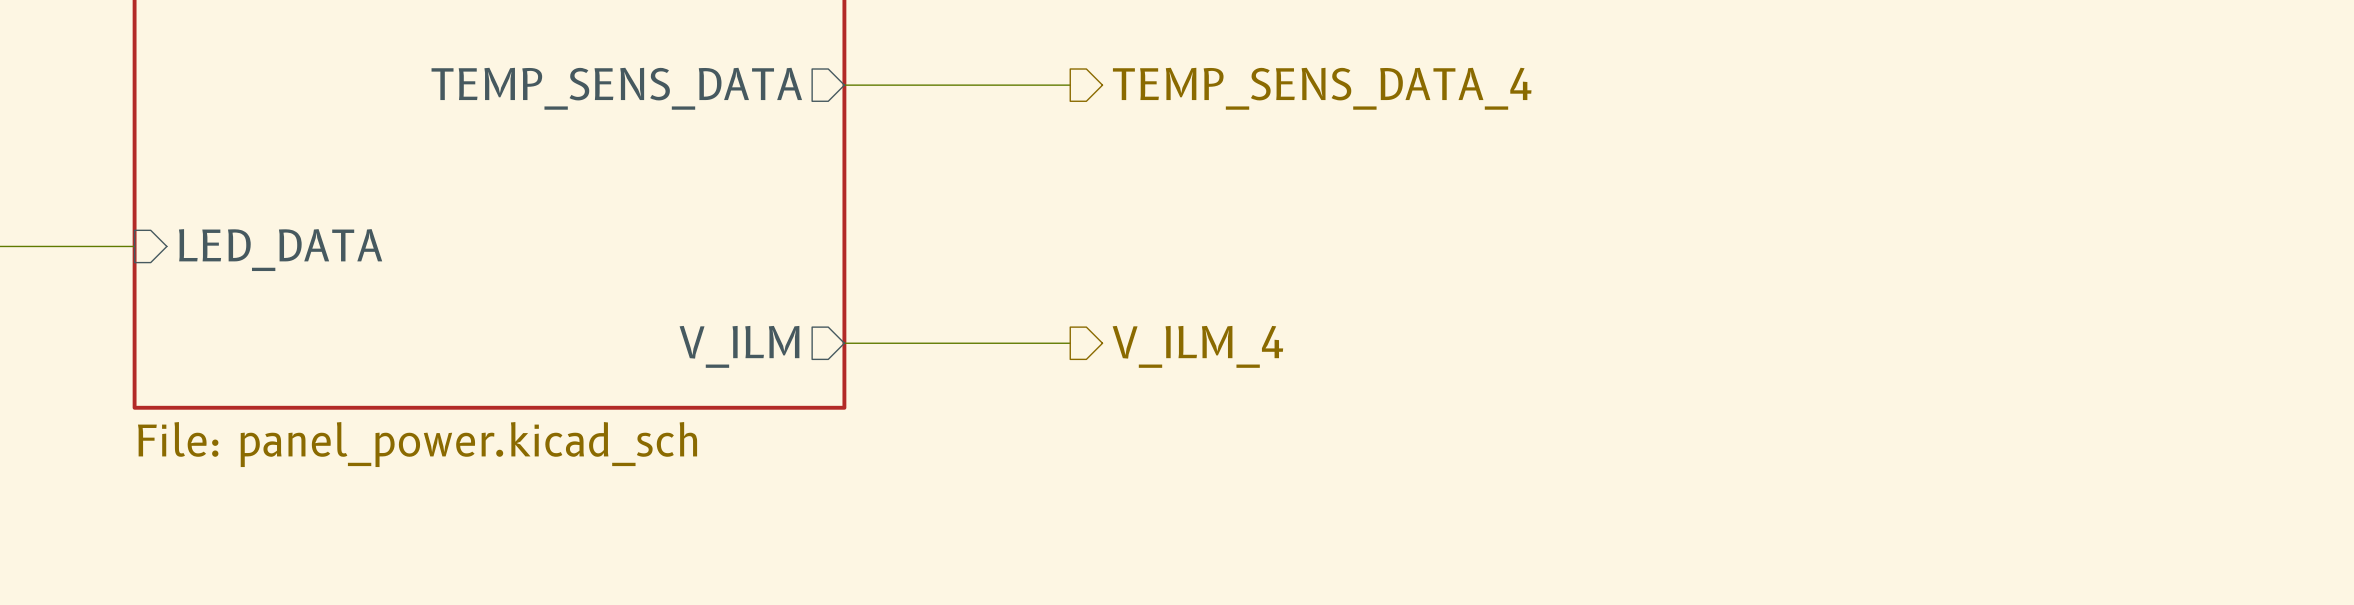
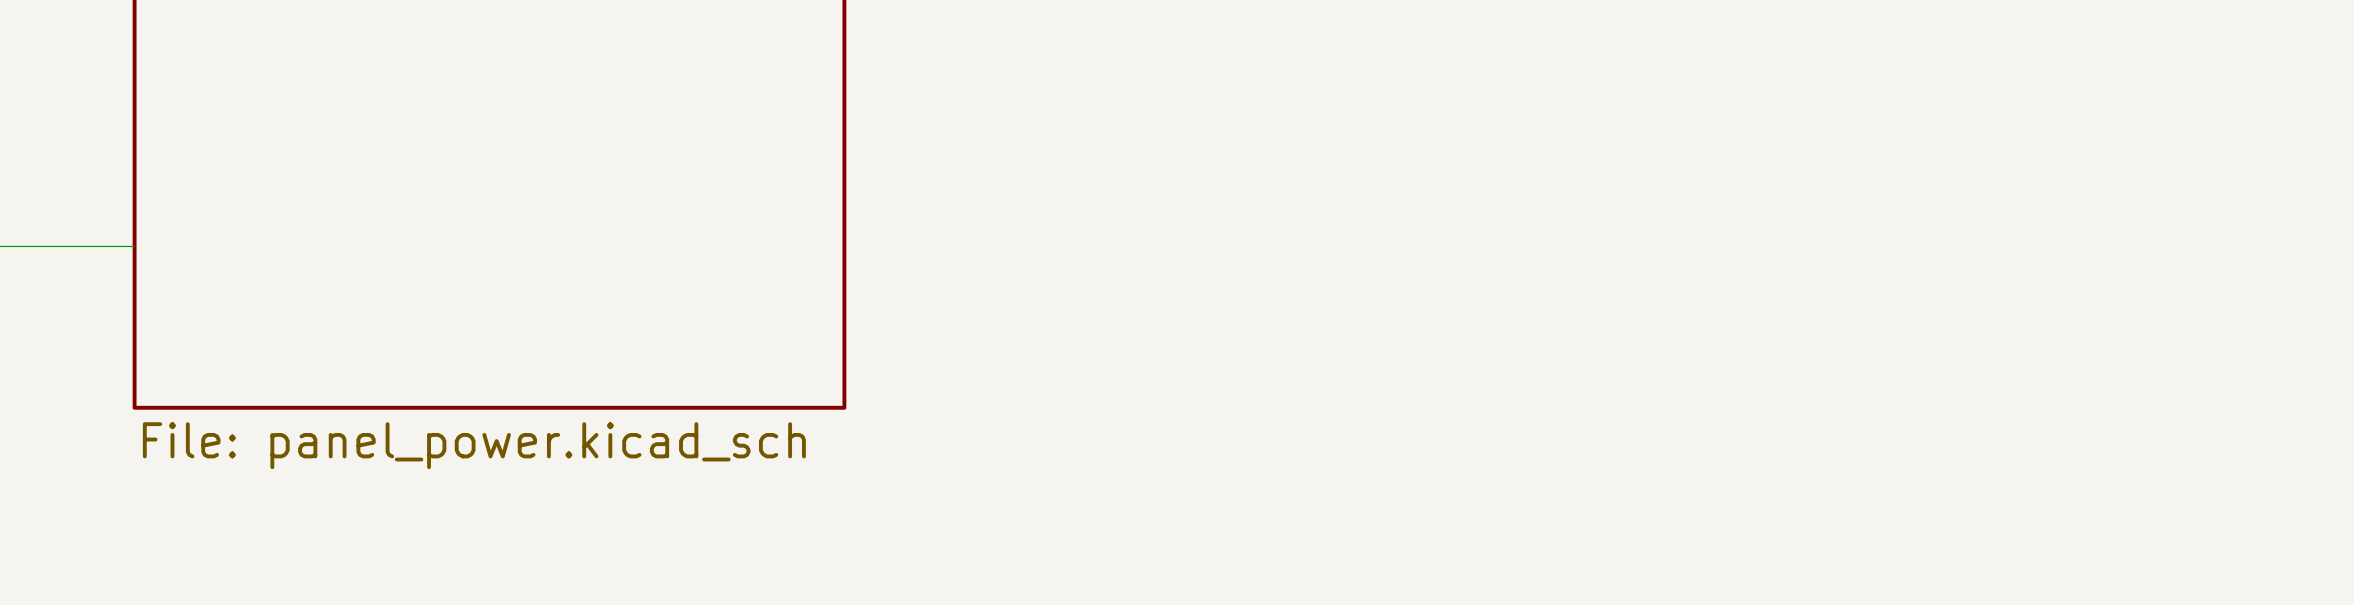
wire: (844, 85) (1070, 85) -> none
sheet pin: TEMP_SENS_DATA (616, 88) -> none
hierarchical label: TEMP_SENS_DATA_4 (1322, 88) -> none
sheet pin: LED_DATA (280, 250) -> none
wire: (844, 343) (1070, 343) -> none
sheet pin: V_ILM (739, 346) -> none
hierarchical label: V_ILM_4 (1197, 346) -> none

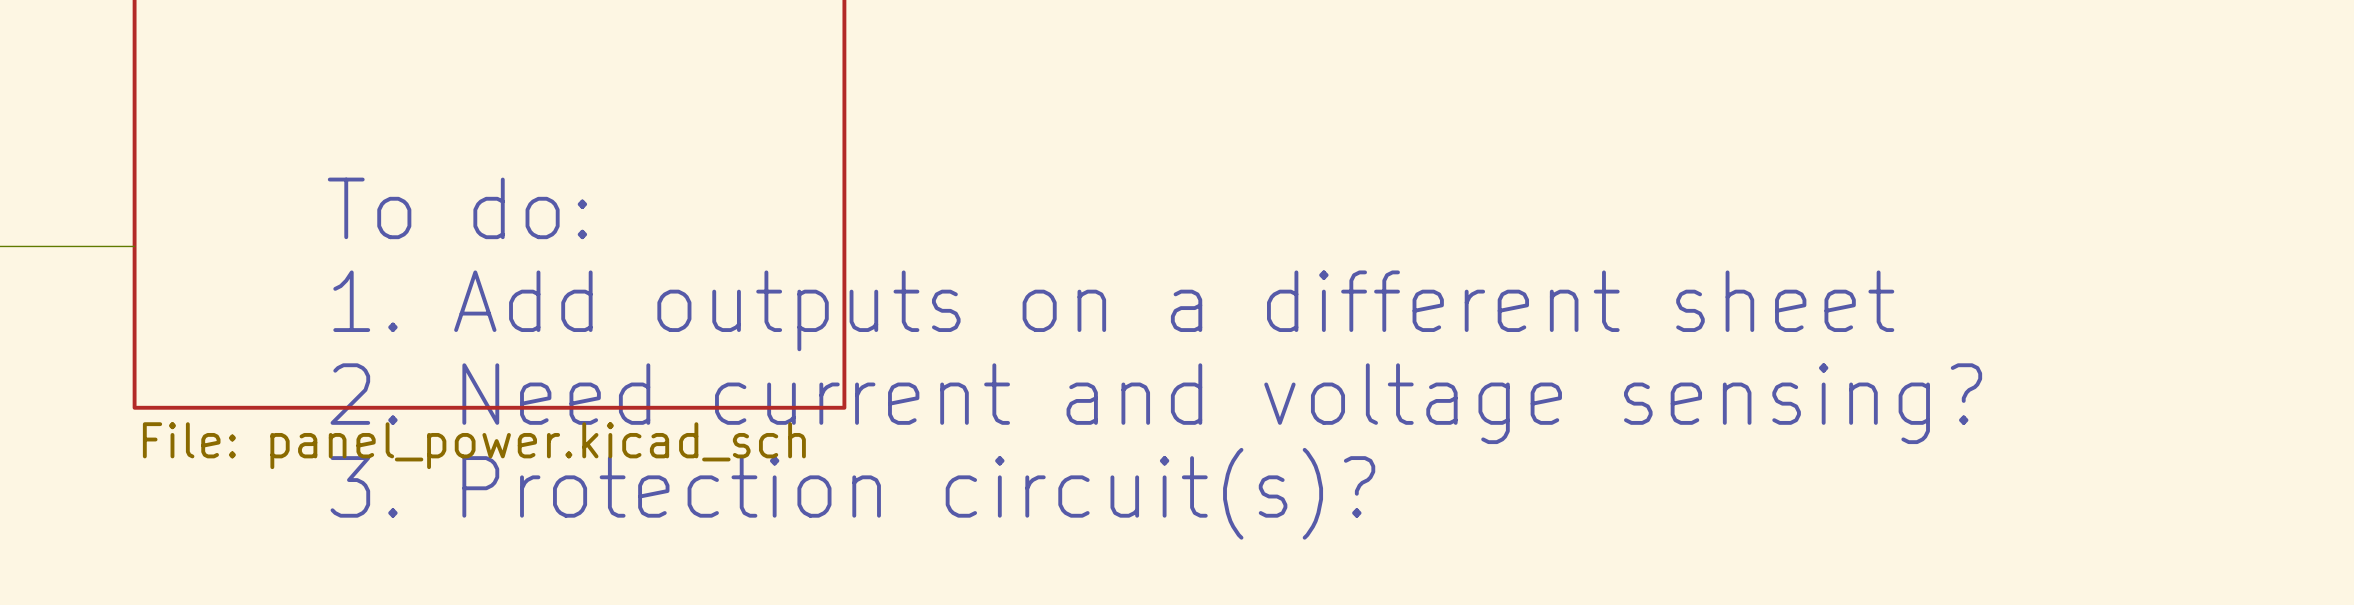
text: none -> To do: (457, 208)
text: none -> 1. Add outputs on a different sheet (1113, 310)
text: none -> 2. Need current and voltage sensing? (1156, 403)
text: none -> 3. Protection circuit(s)? (852, 493)

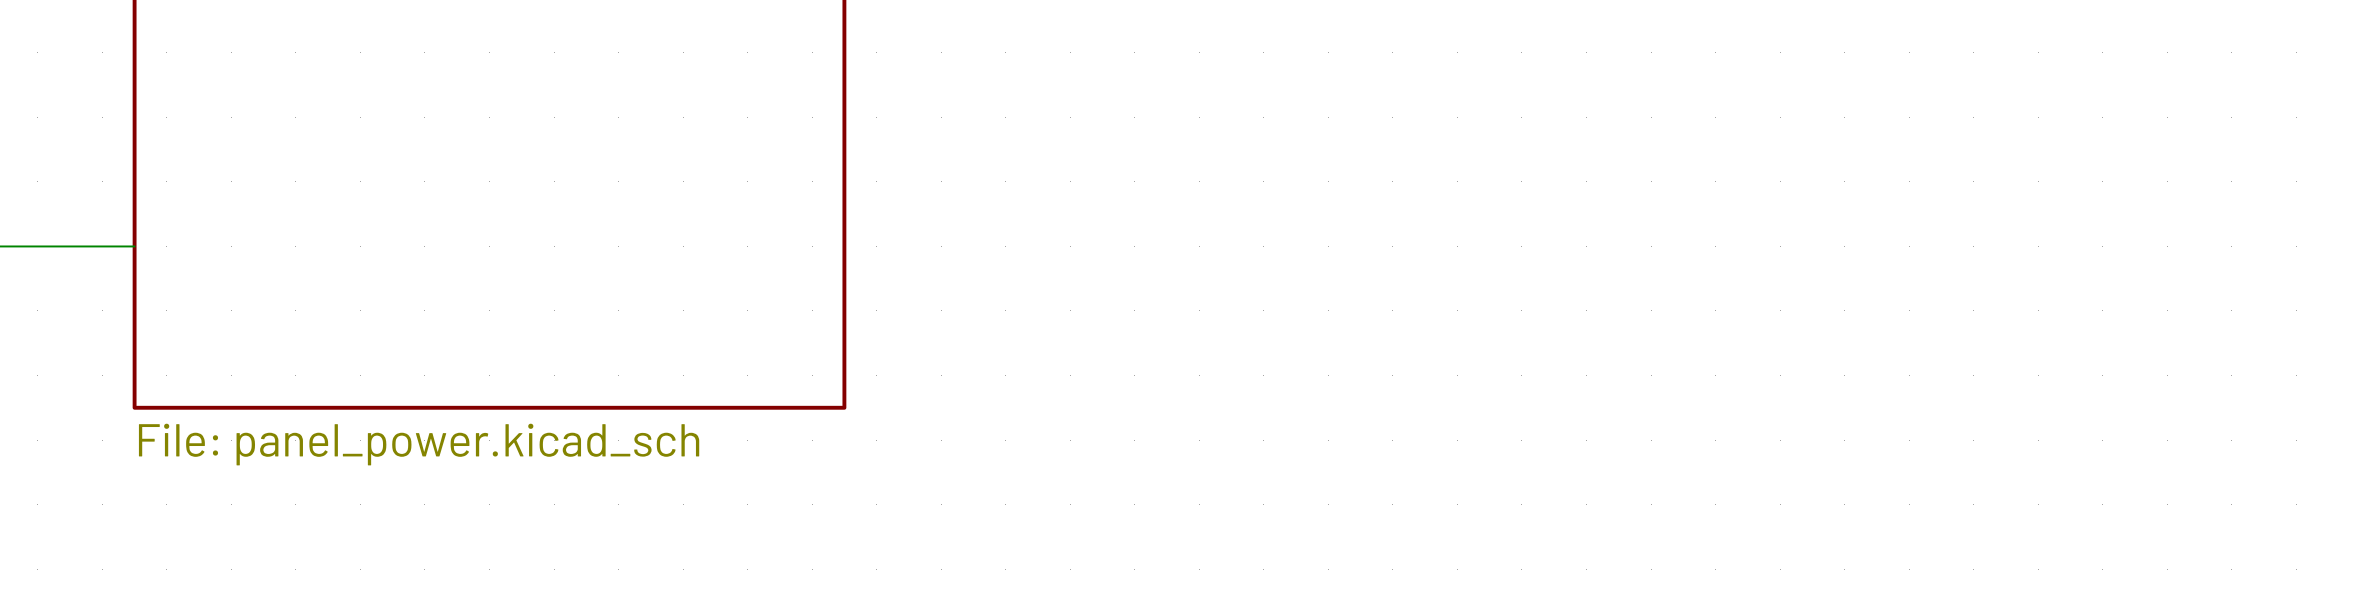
text: To do: (457, 208) -> none
text: 1. Add outputs on a different sheet (1113, 310) -> none
text: 2. Need current and voltage sensing? (1156, 403) -> none
text: 3. Protection circuit(s)? (852, 493) -> none

